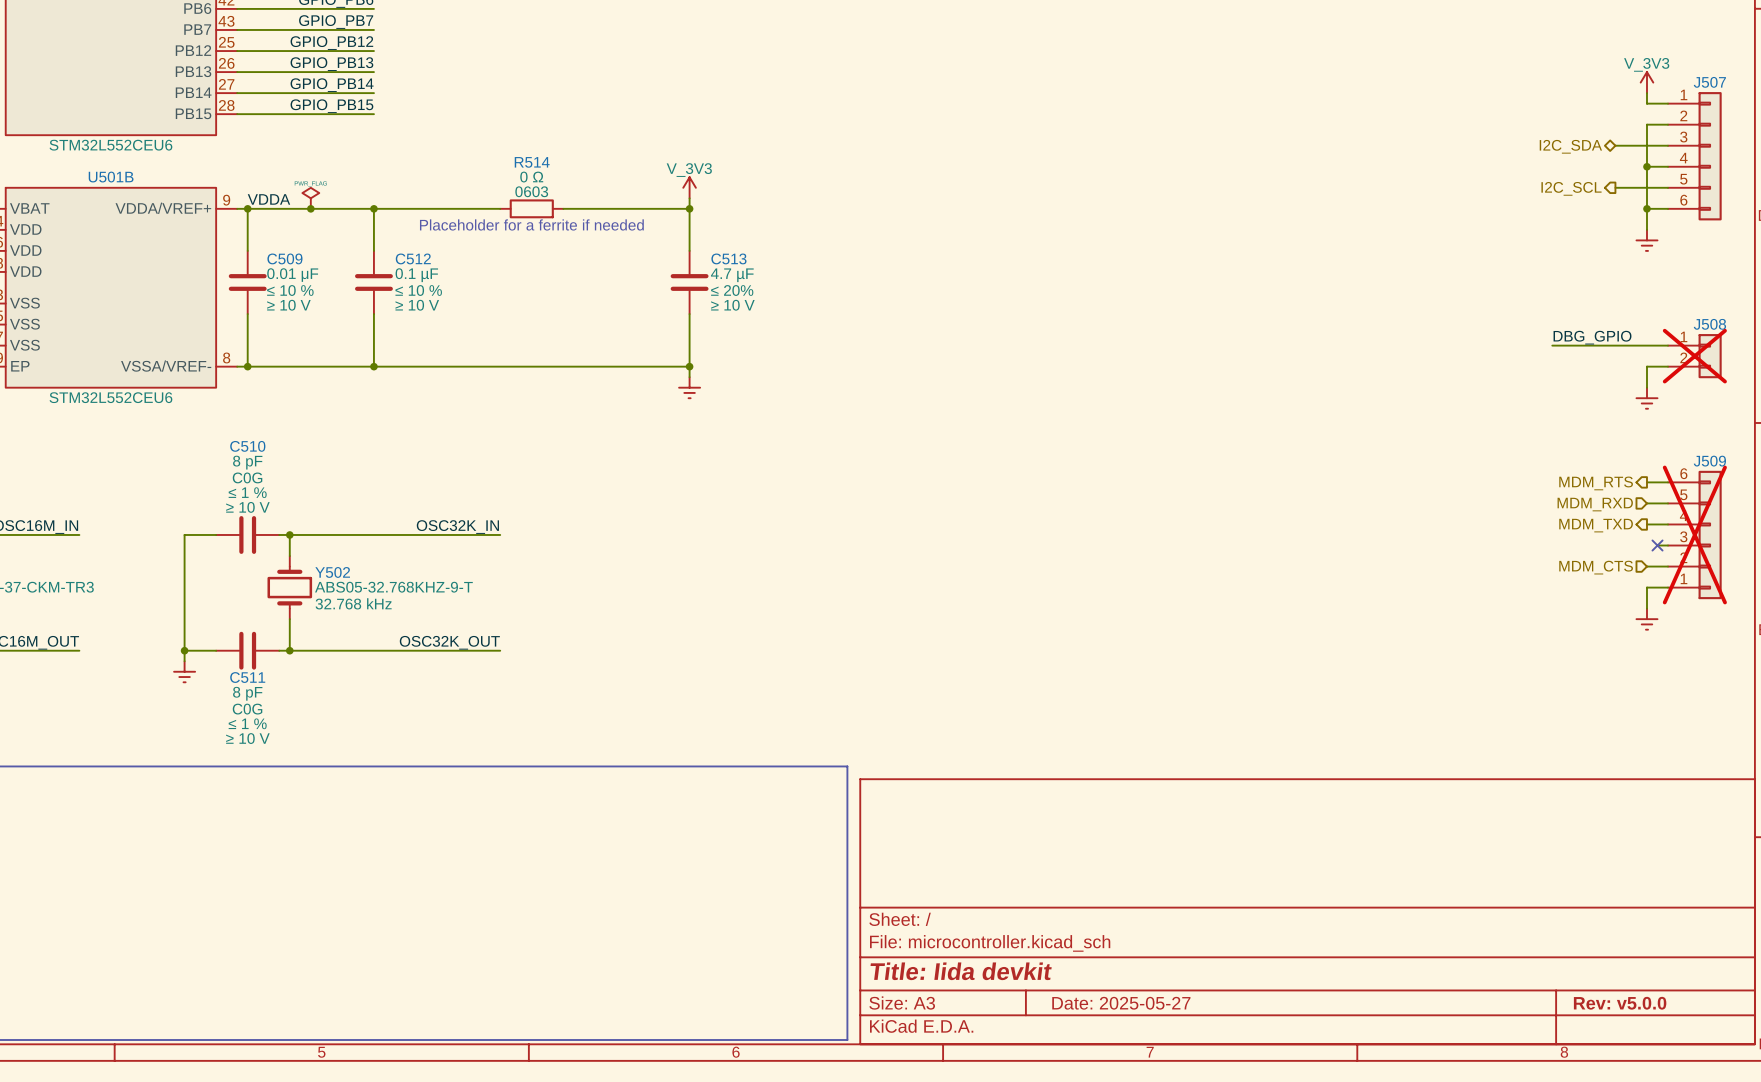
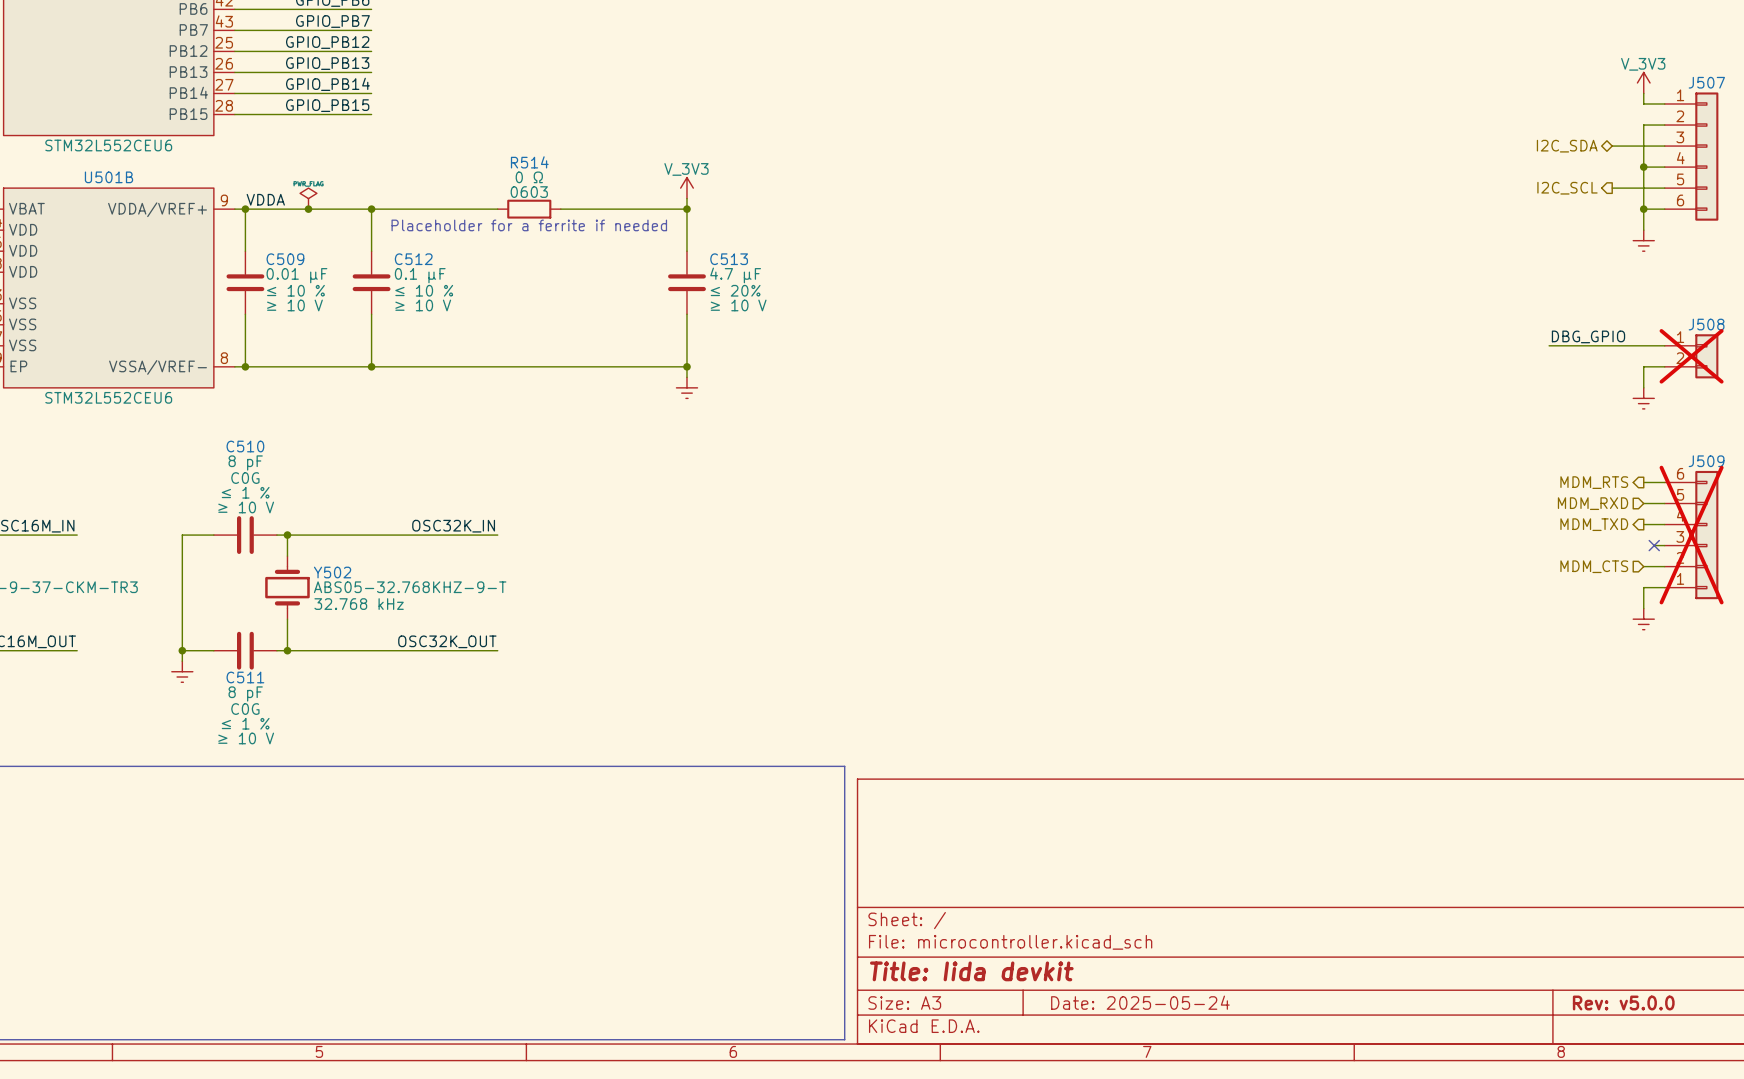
title block: Date: 2025-05-27 (1121, 1003) -> Date: 2025-05-24 (1140, 1002)

